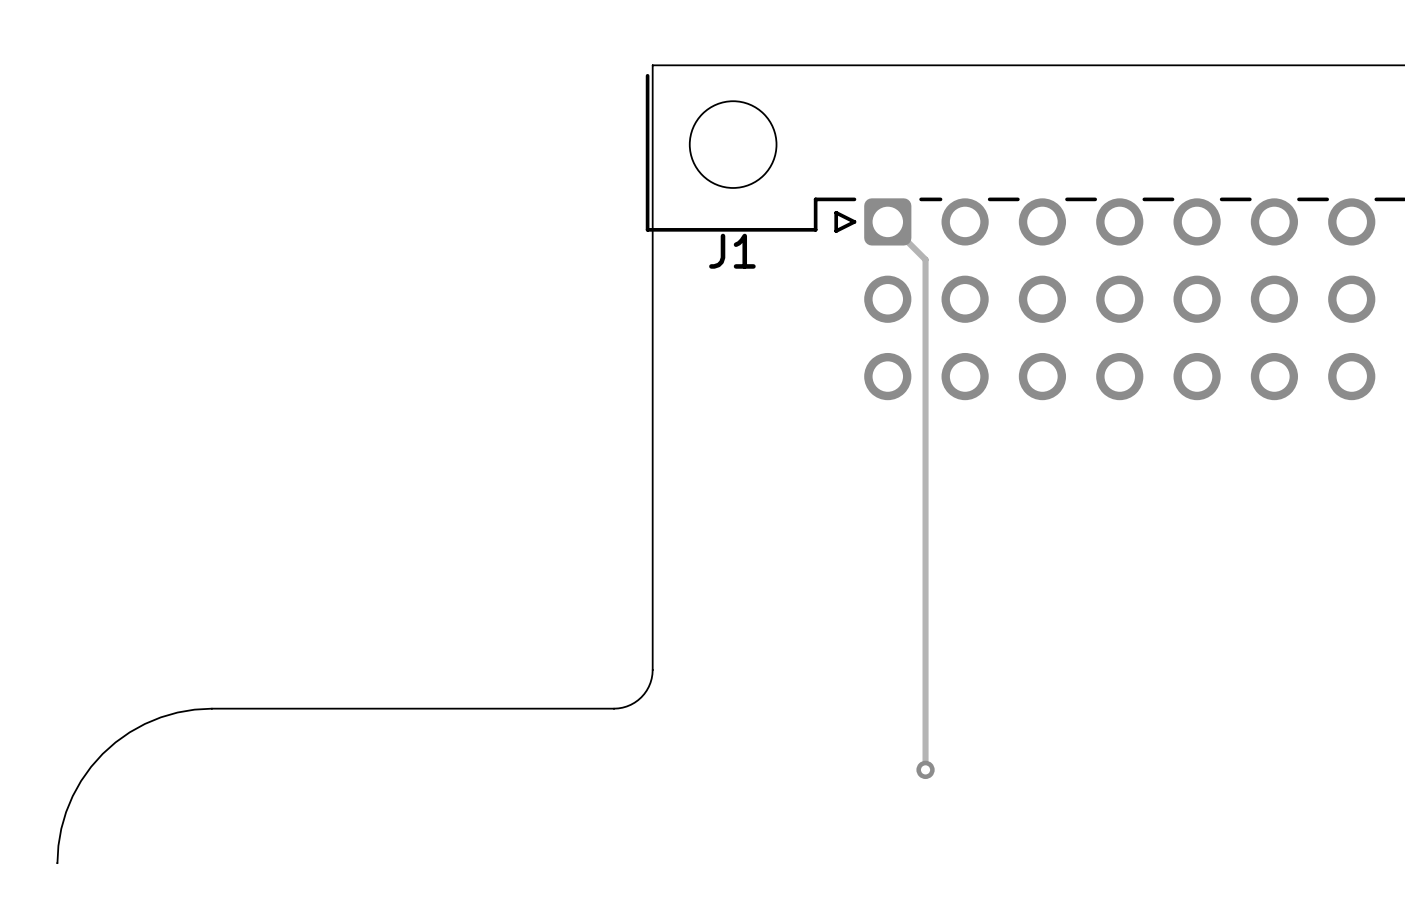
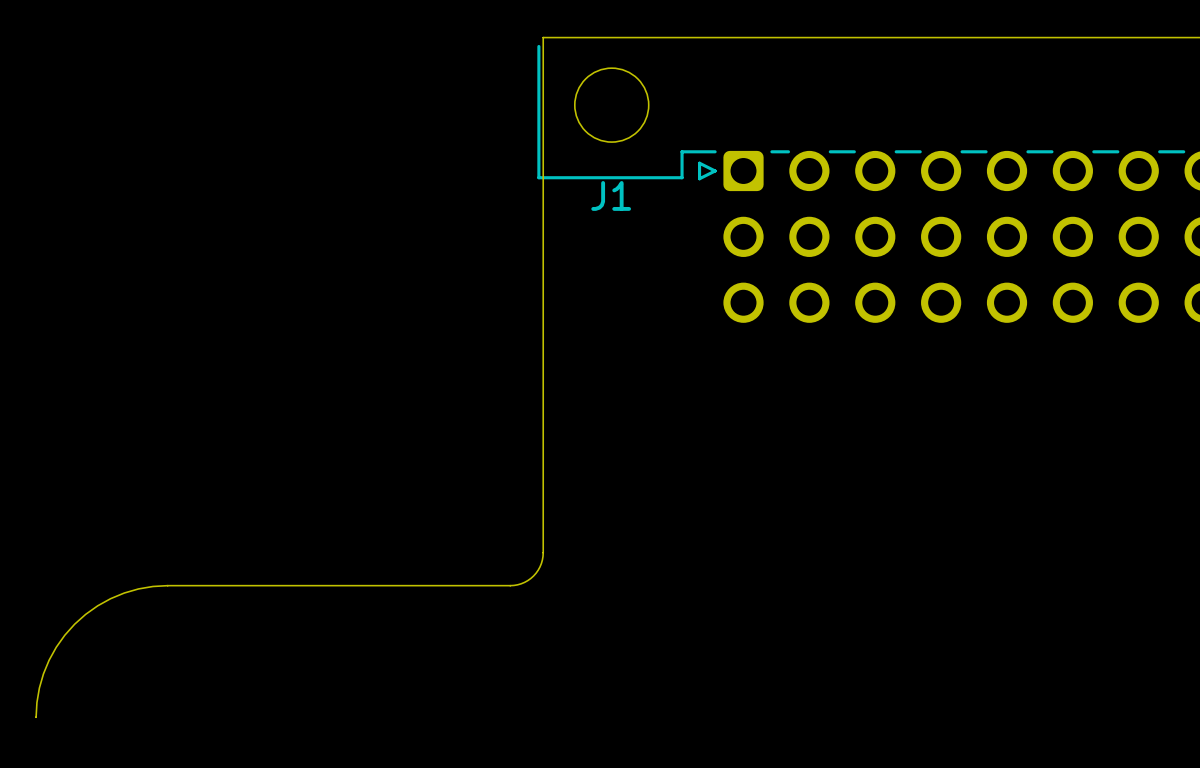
track: (887, 221) (925, 259) (925, 769) -> none
via: (925, 769) -> none

